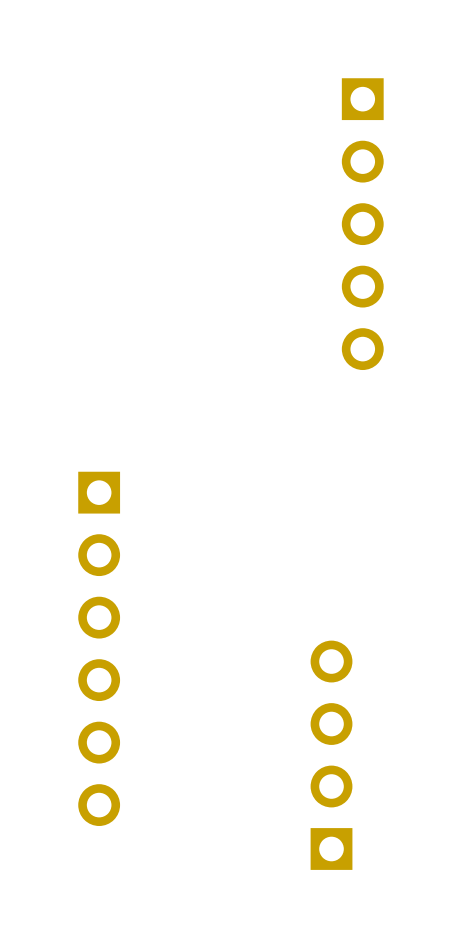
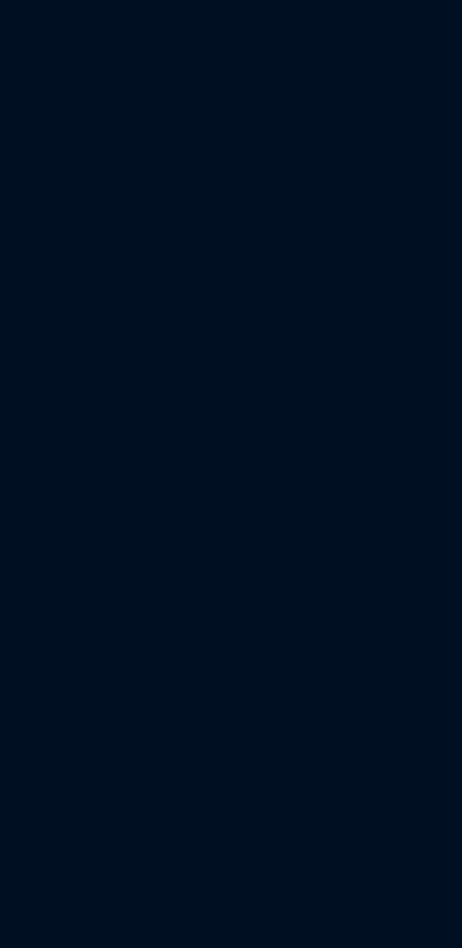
part: (362, 224) -> none
part: (99, 648) -> none
part: (331, 755) -> none

